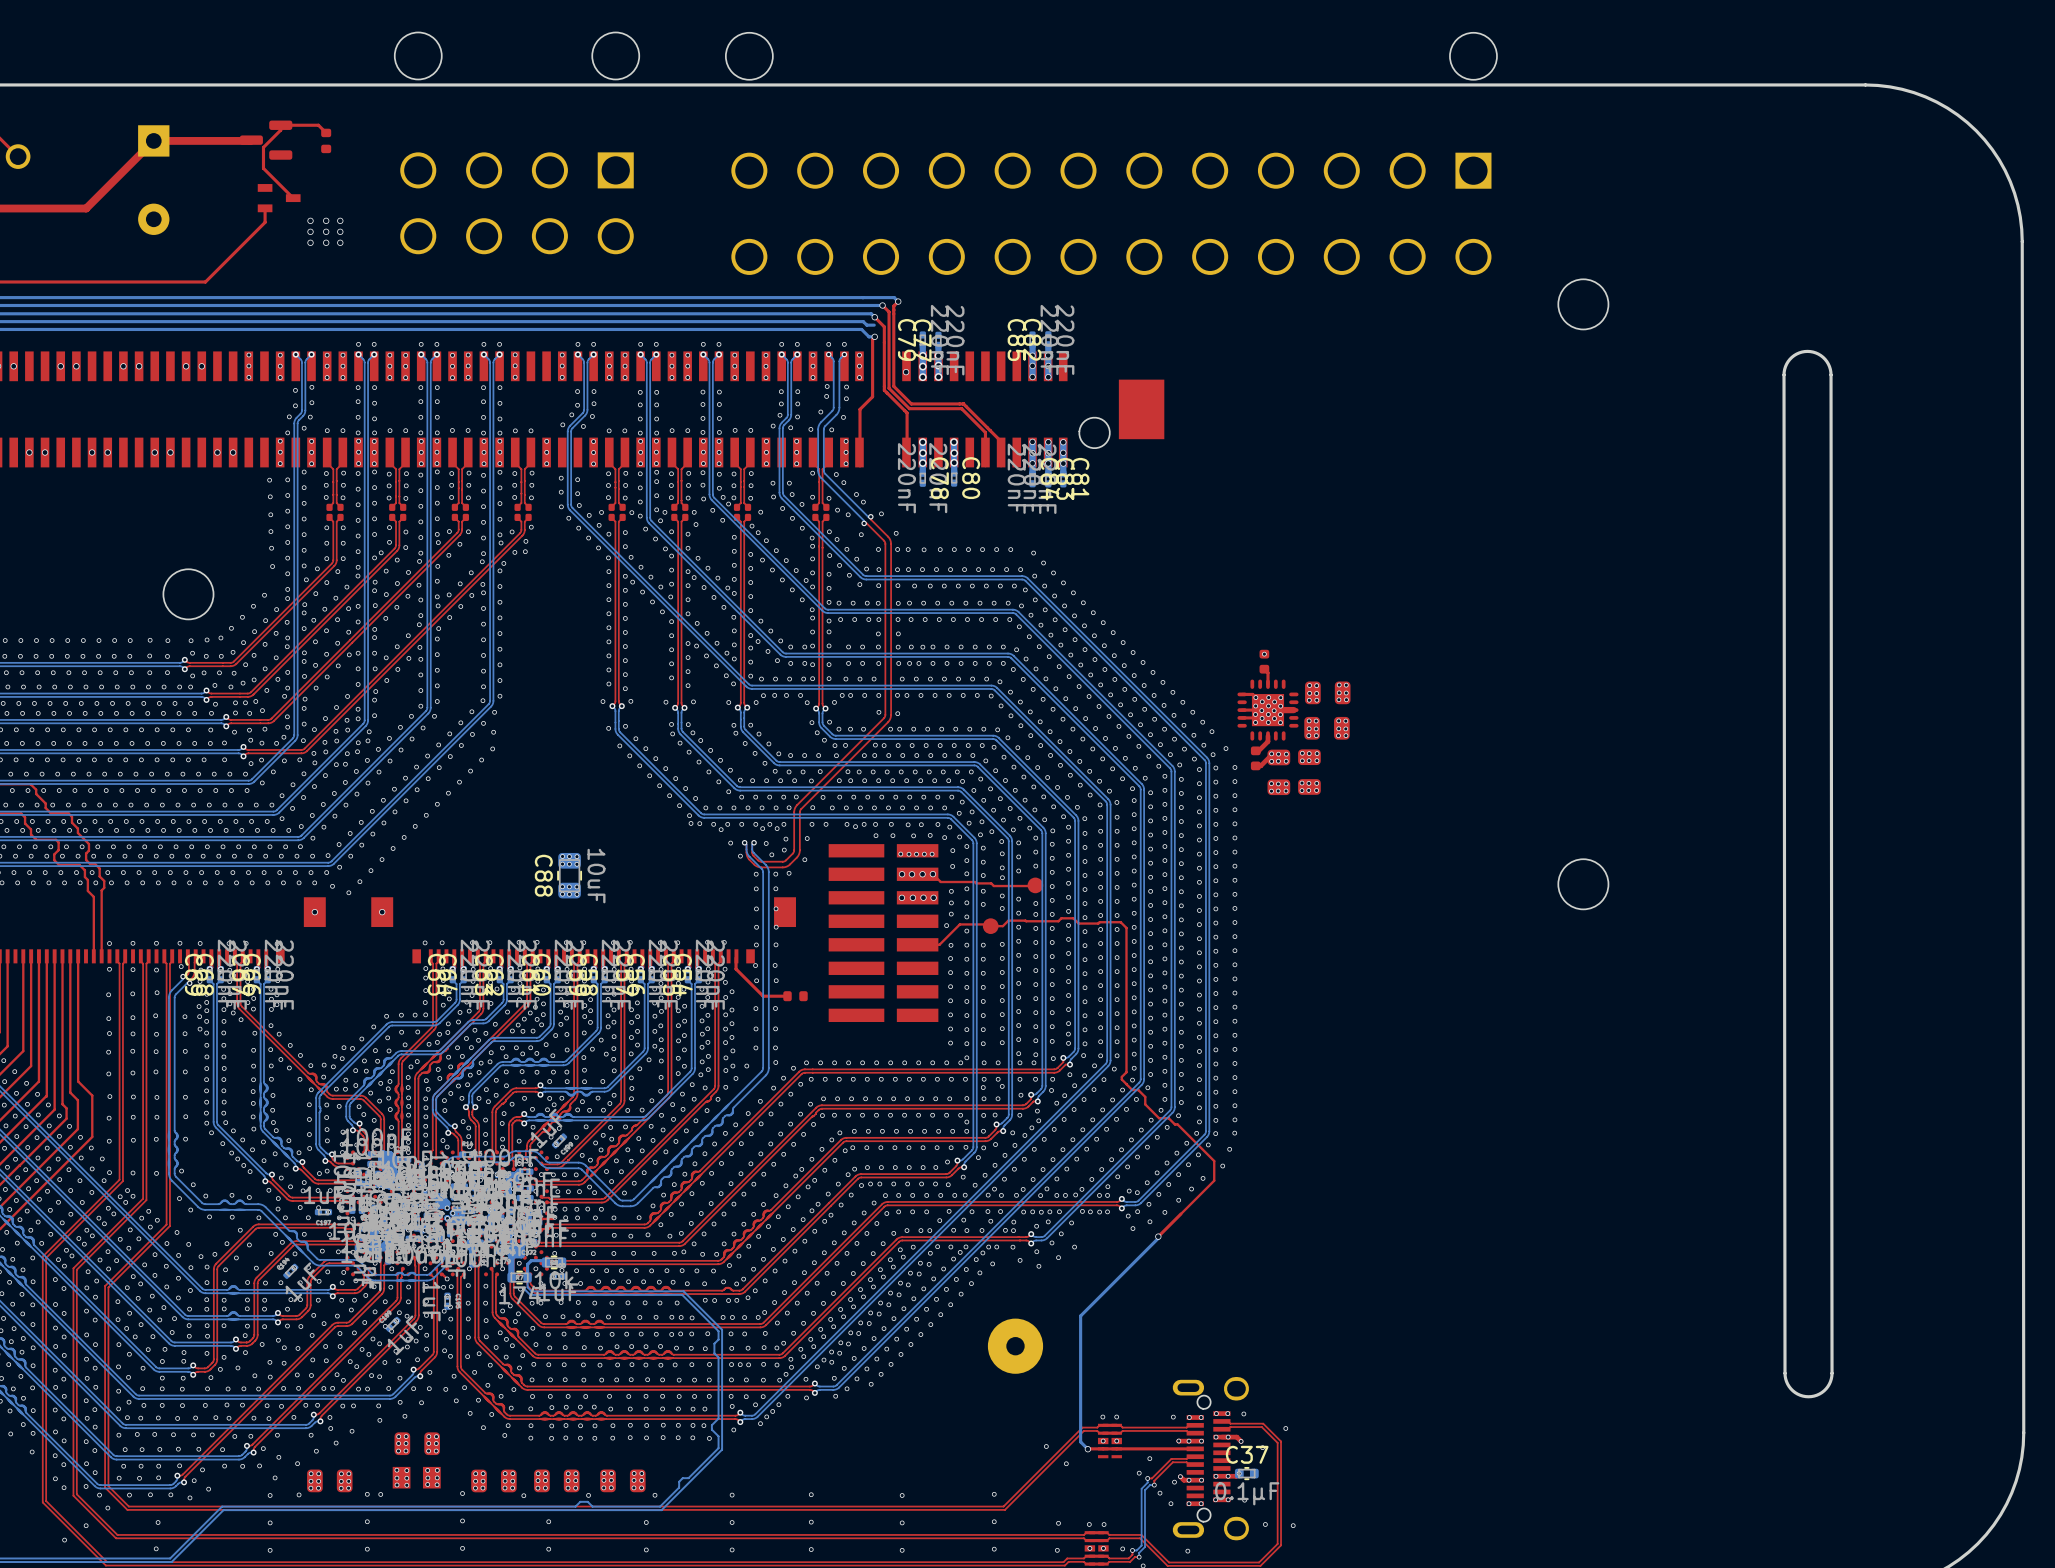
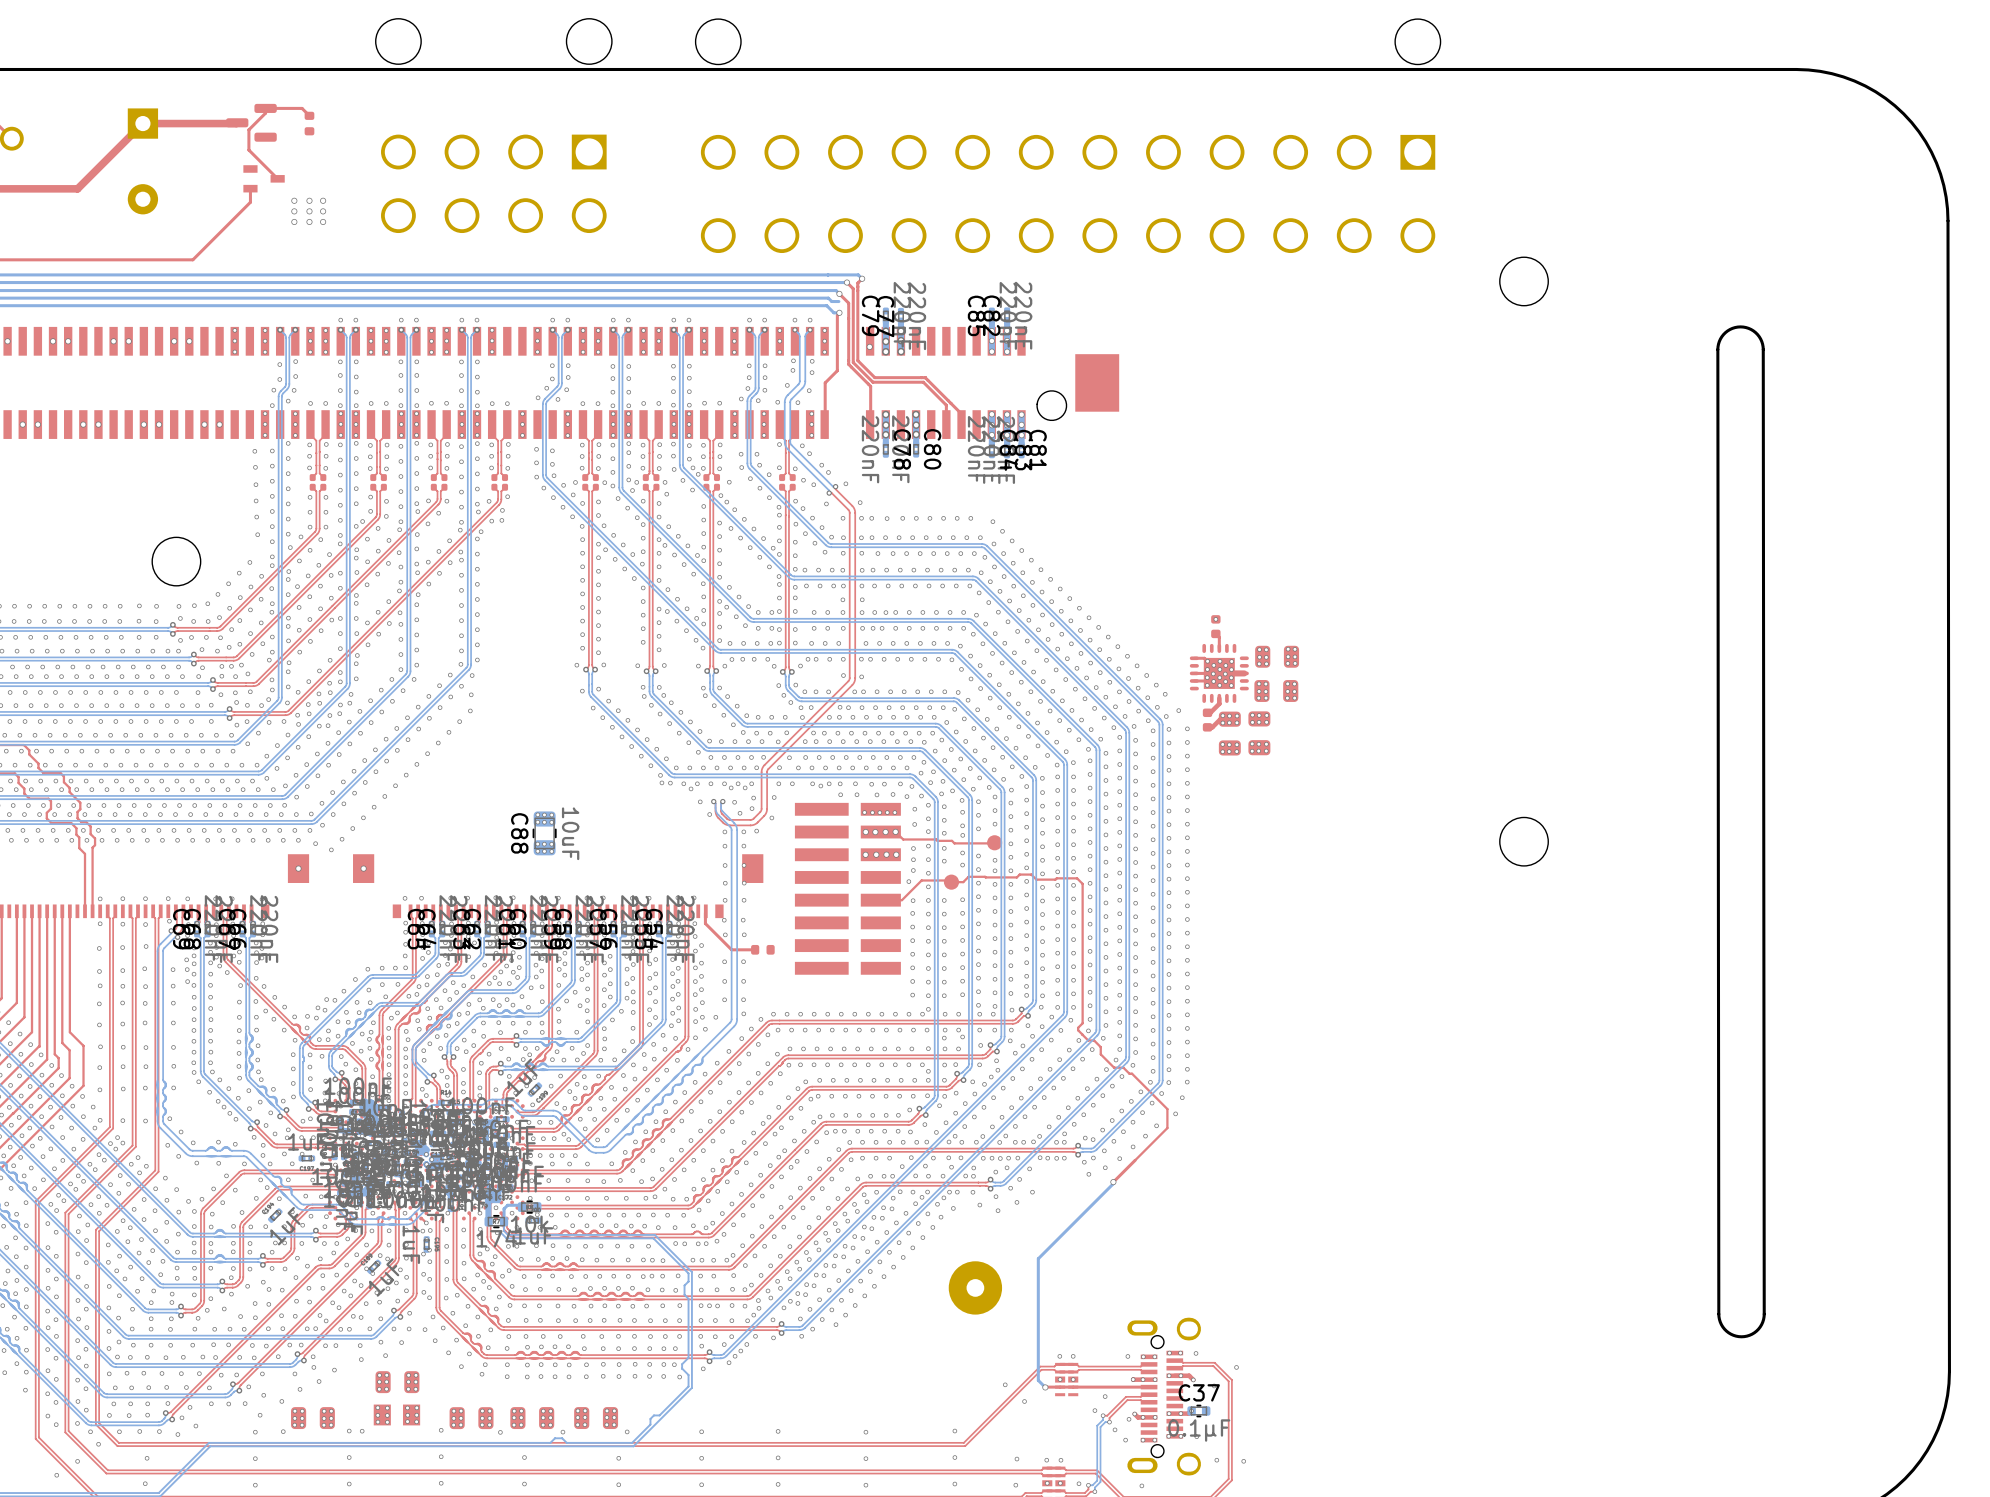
top track: (554, 1217) (541, 1218) -> none
via: (565, 1217) -> none

